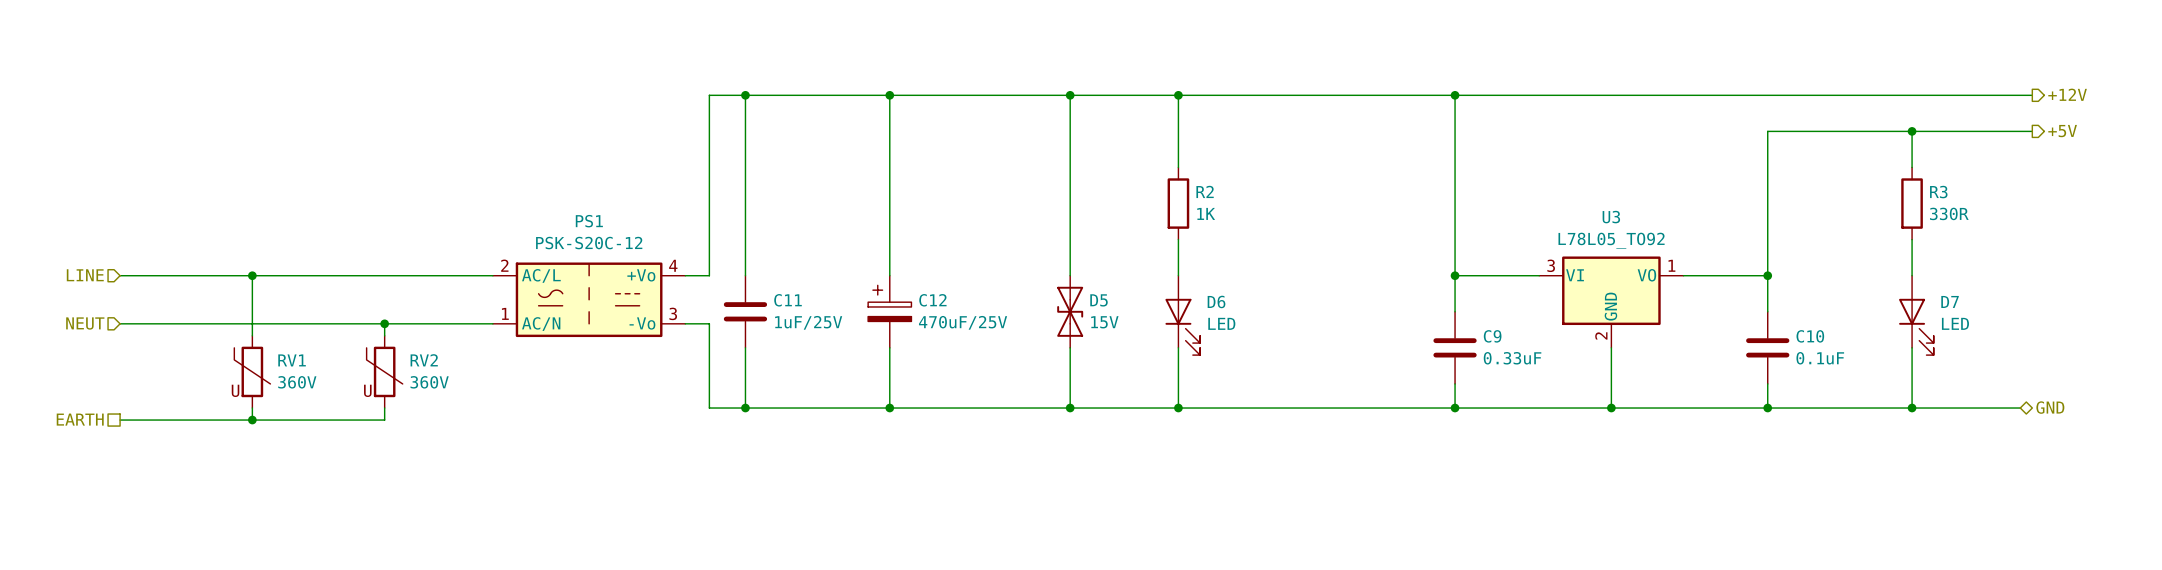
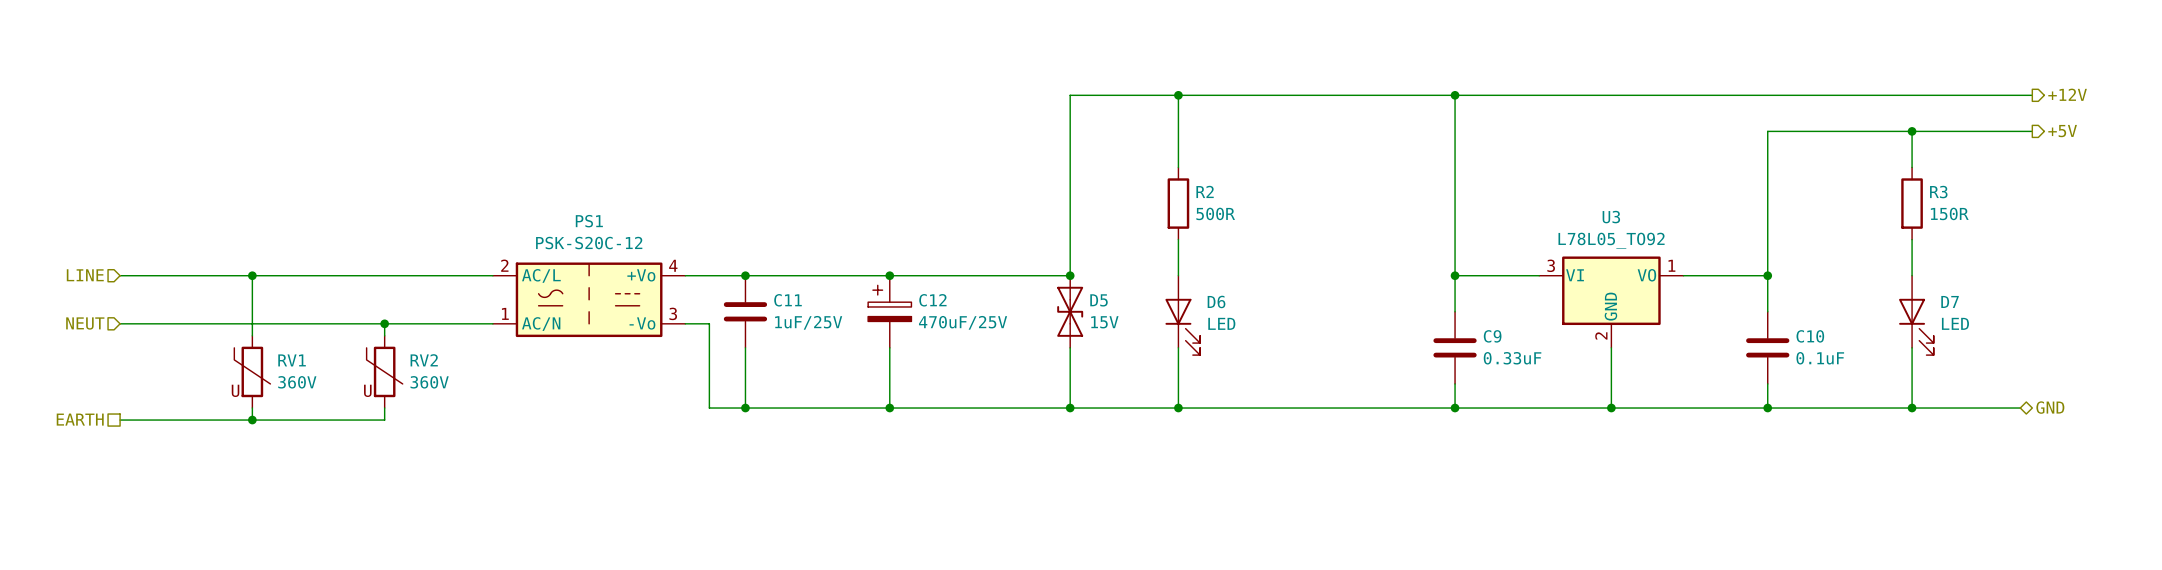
wire: (745, 95) (745, 275) -> none
junction: (745, 95) -> none
wire: (889, 95) (889, 275) -> none
junction: (889, 95) -> none
wire: (1070, 95) (709, 95) (709, 275) -> (1070, 275) (709, 275)
junction: (1070, 95) -> none
R2 value: 1K (1206, 213) -> 500R (1215, 213)
R3 value: 330R (1949, 213) -> 150R (1949, 213)
junction: none -> (745, 275)
junction: none -> (889, 275)
junction: none -> (1070, 275)

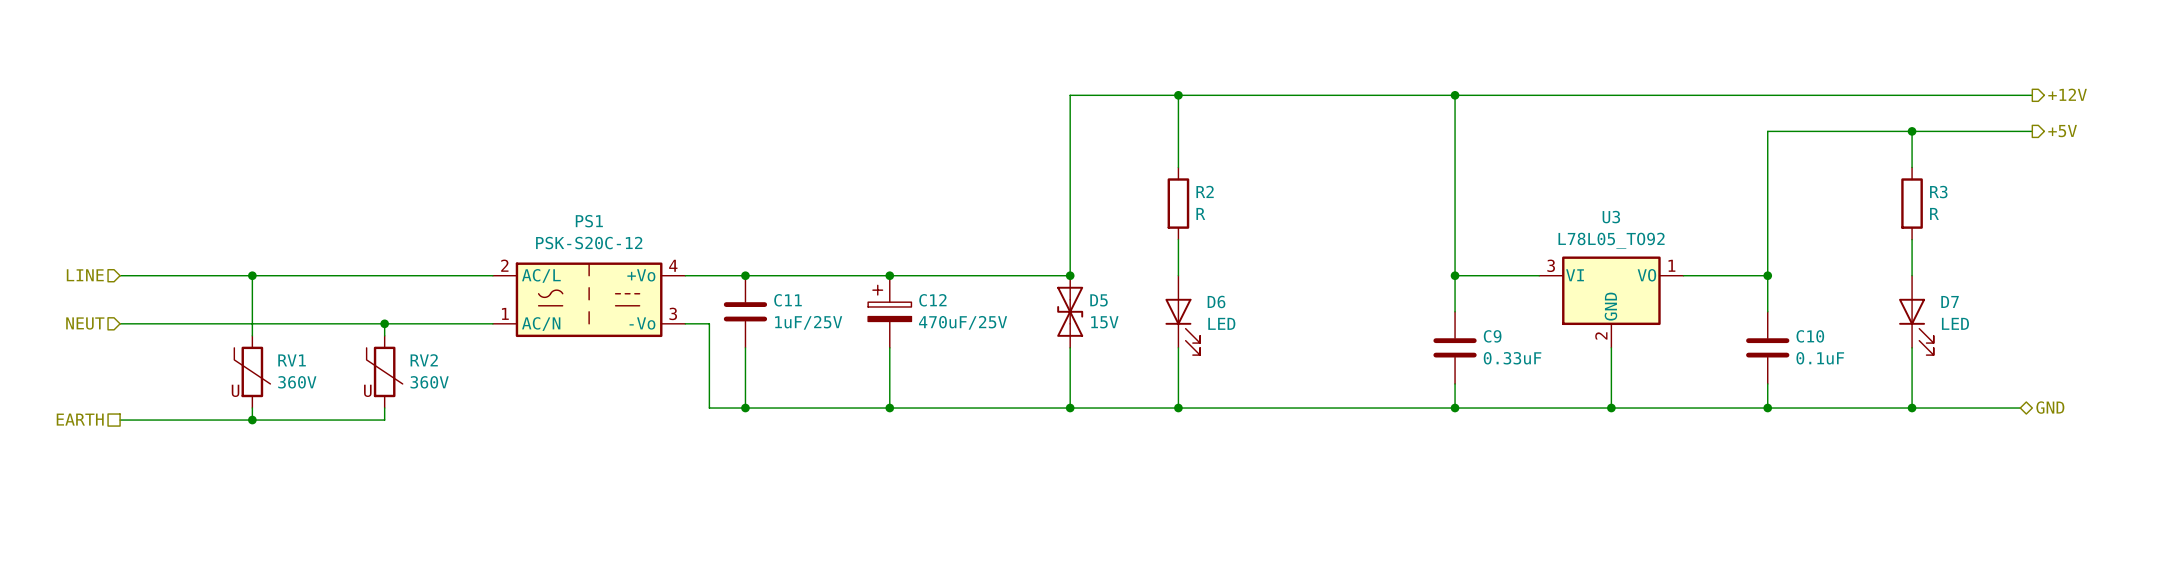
R2 value: 500R (1215, 213) -> R (1200, 213)
R3 value: 150R (1949, 213) -> R (1934, 213)

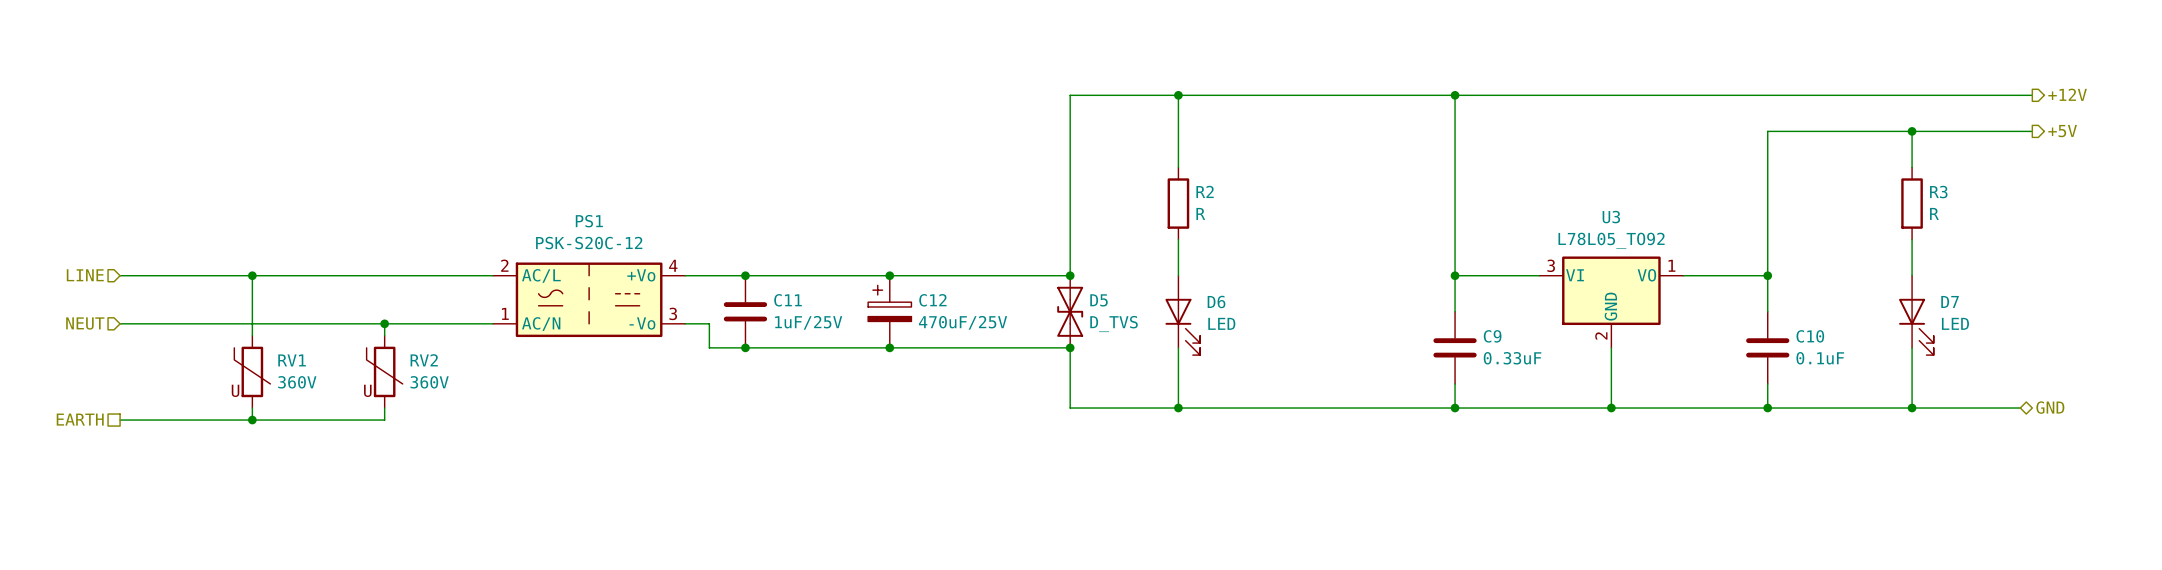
D5 value: 15V (1104, 322) -> D_TVS (1114, 324)
wire: (709, 347) (709, 408) (1070, 408) -> (709, 347) (1070, 347)
wire: (745, 347) (745, 408) -> none
junction: none -> (745, 347)
wire: (889, 347) (889, 408) -> none
junction: none -> (889, 347)
junction: none -> (1070, 347)
junction: (745, 408) -> none
junction: (889, 408) -> none
junction: (1070, 408) -> none

